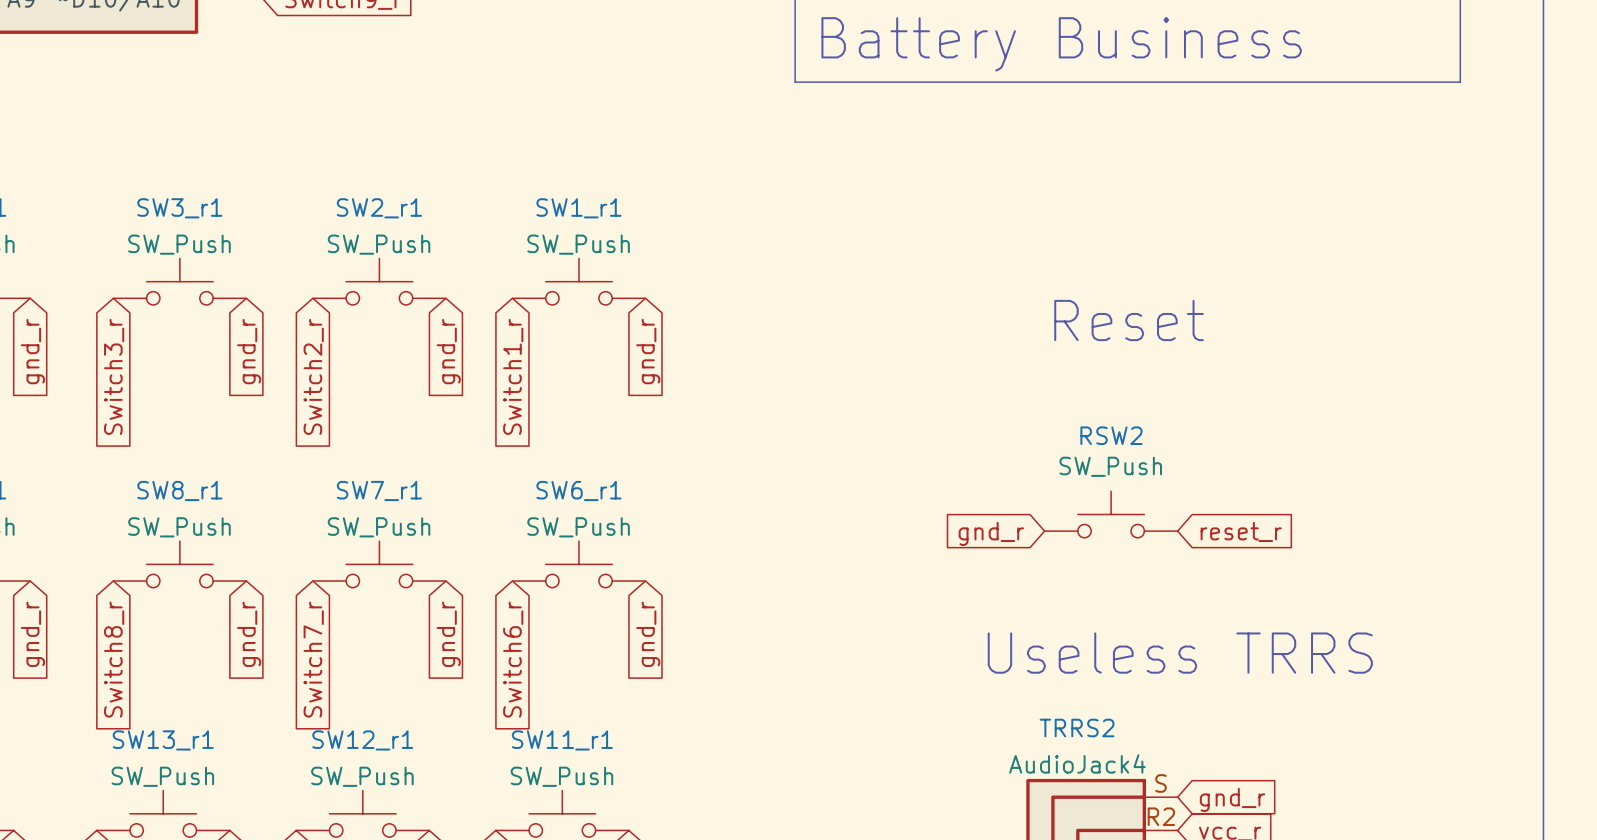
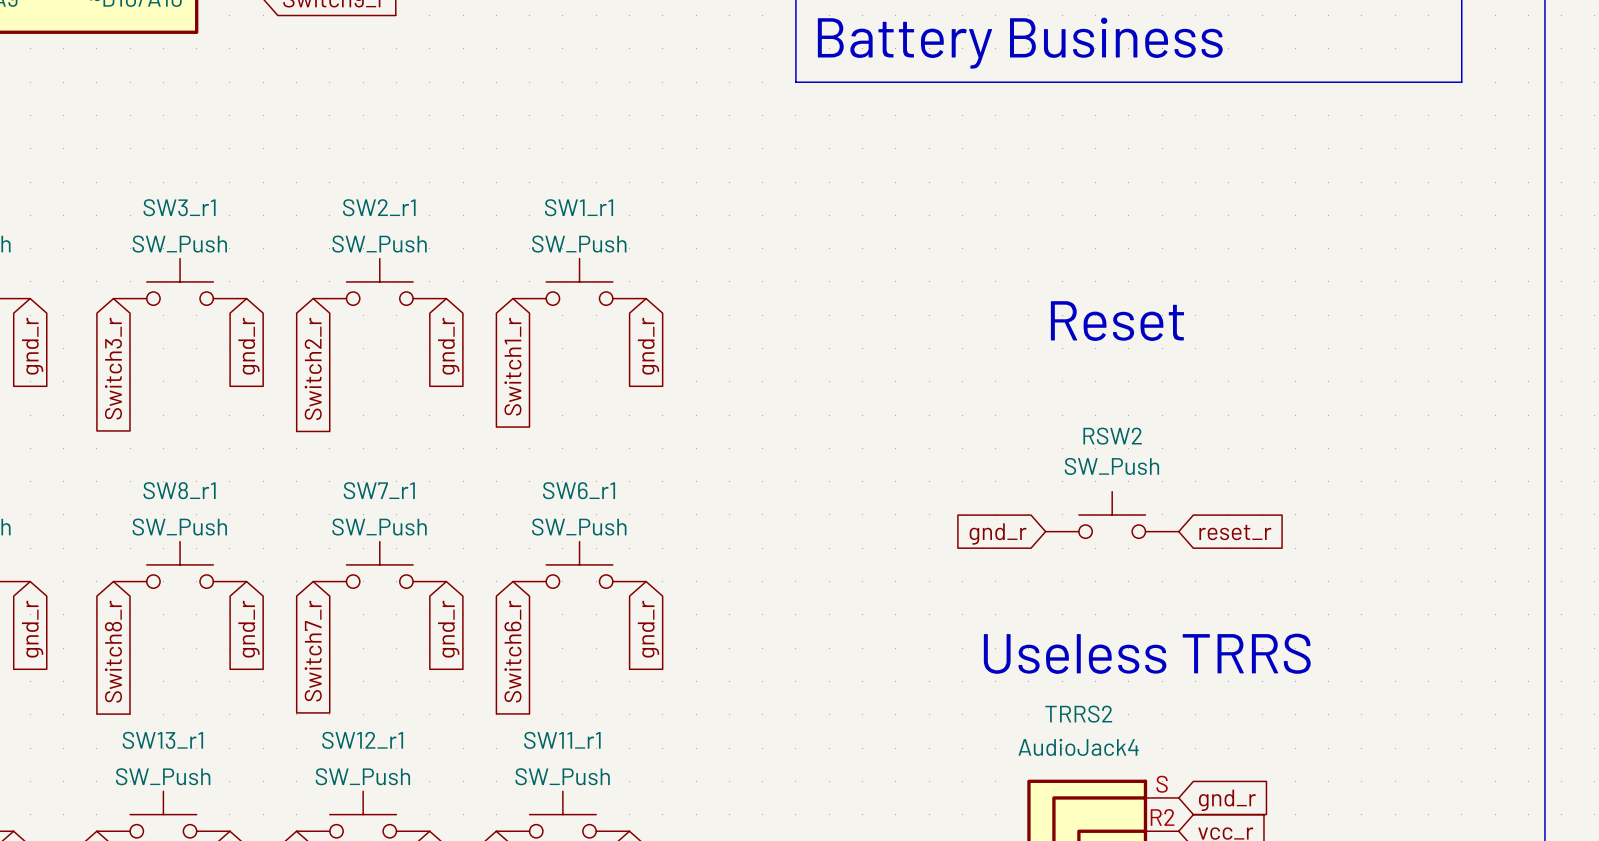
TRRS2 name position: TRRS2 (1077, 728) -> TRRS2 (1078, 714)
TRRS2 value position: AudioJack4 (1077, 763) -> AudioJack4 (1078, 747)

